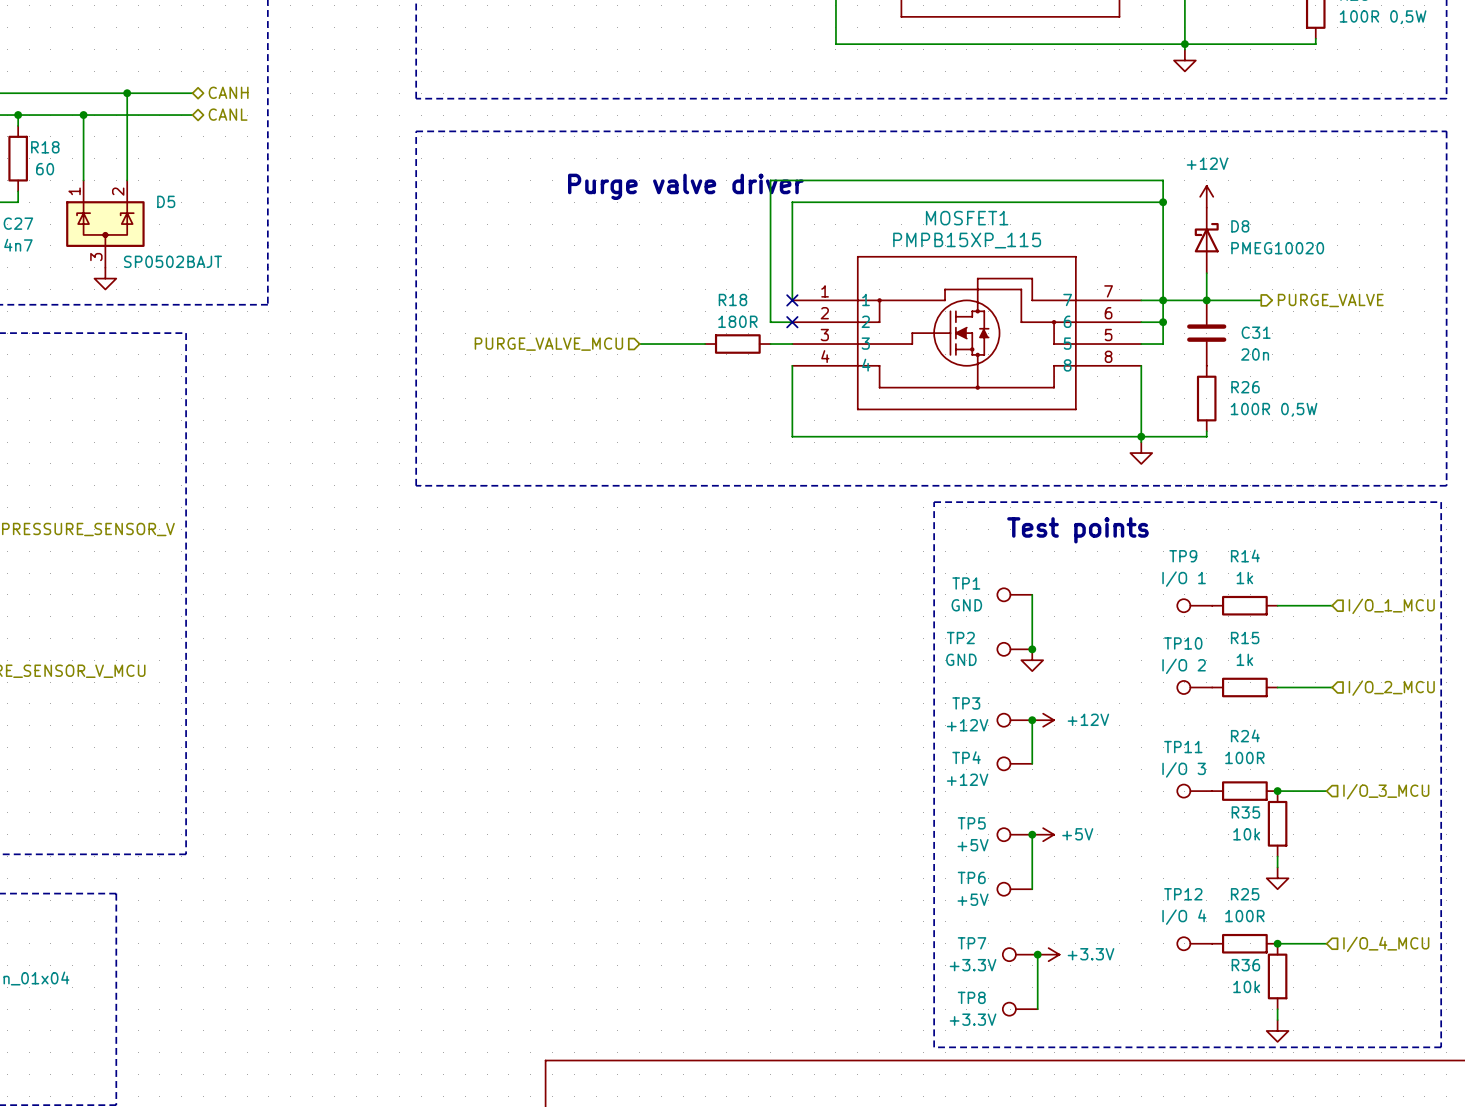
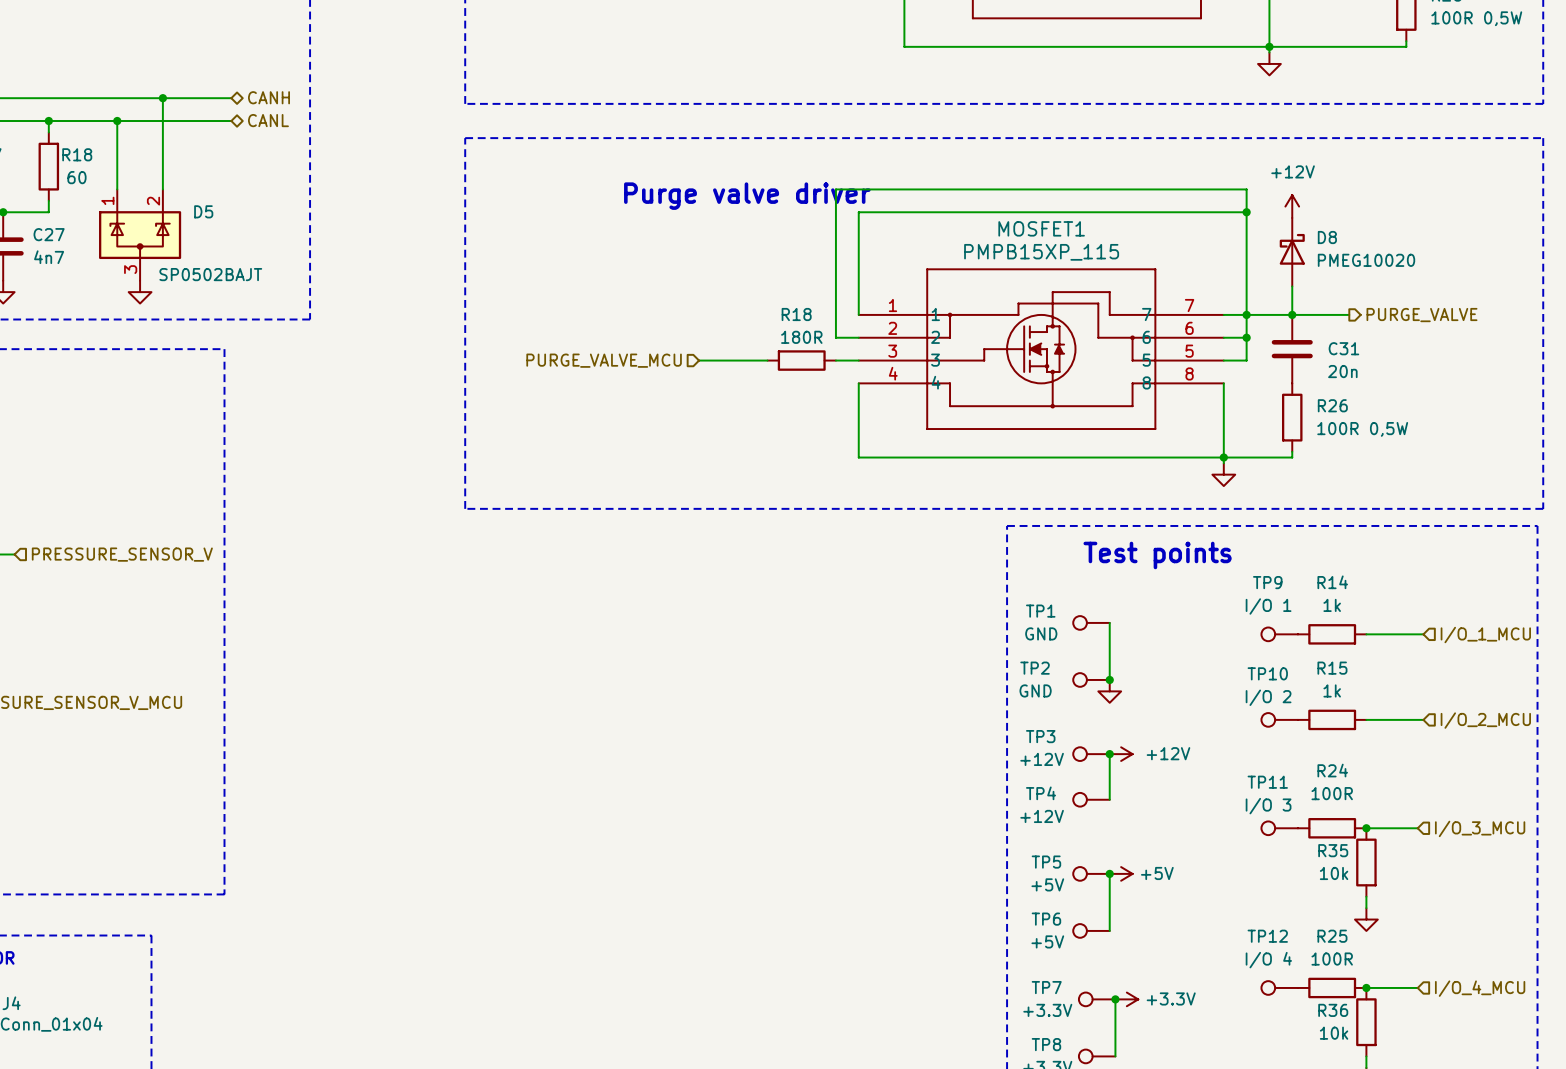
no-connect mark: (792, 300) -> none
no-connect mark: (792, 322) -> none

